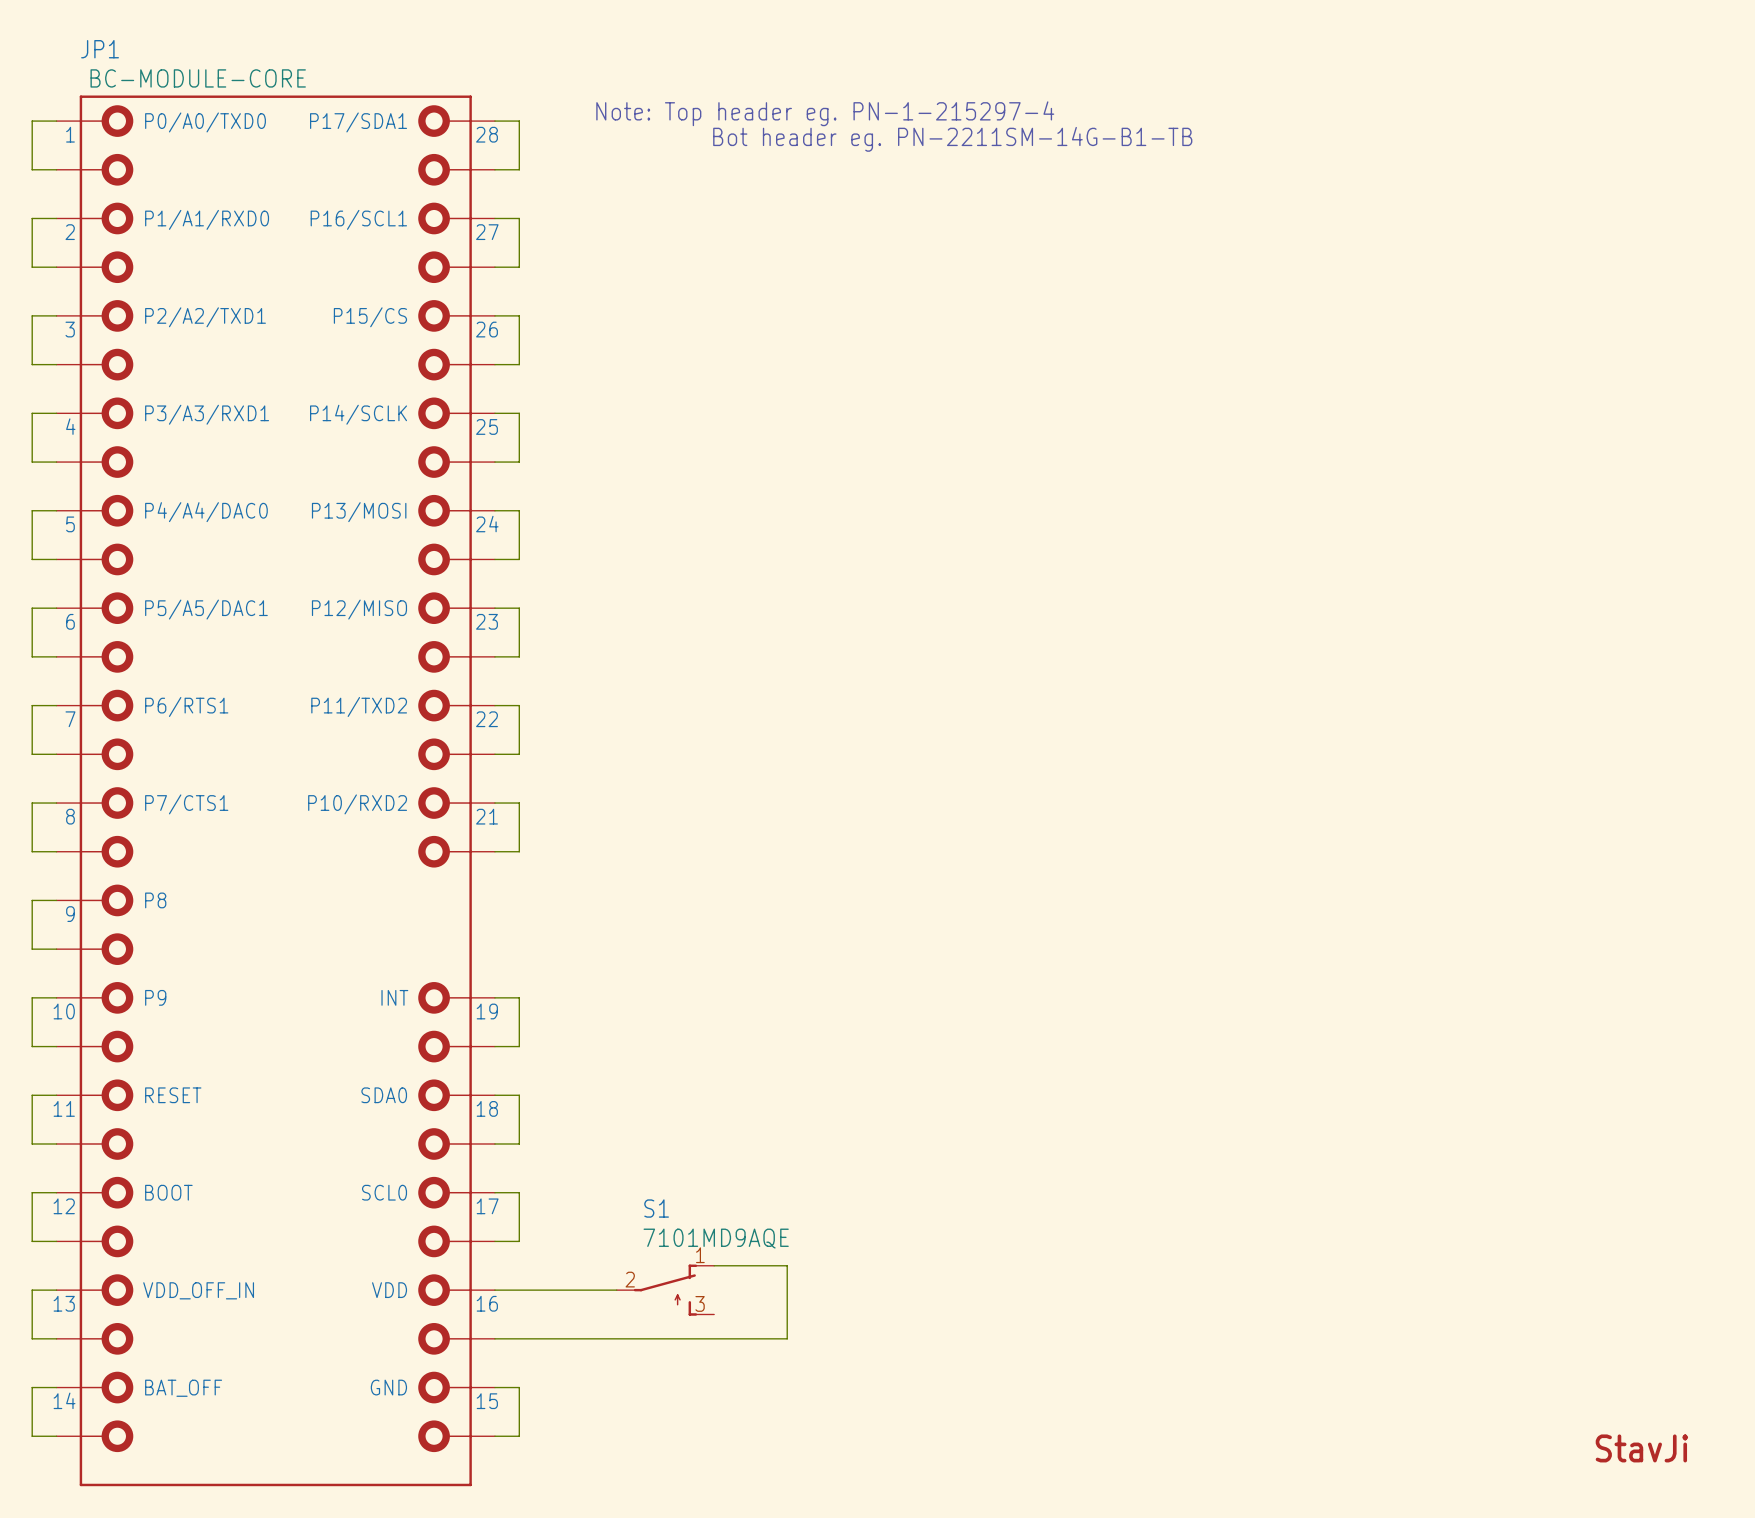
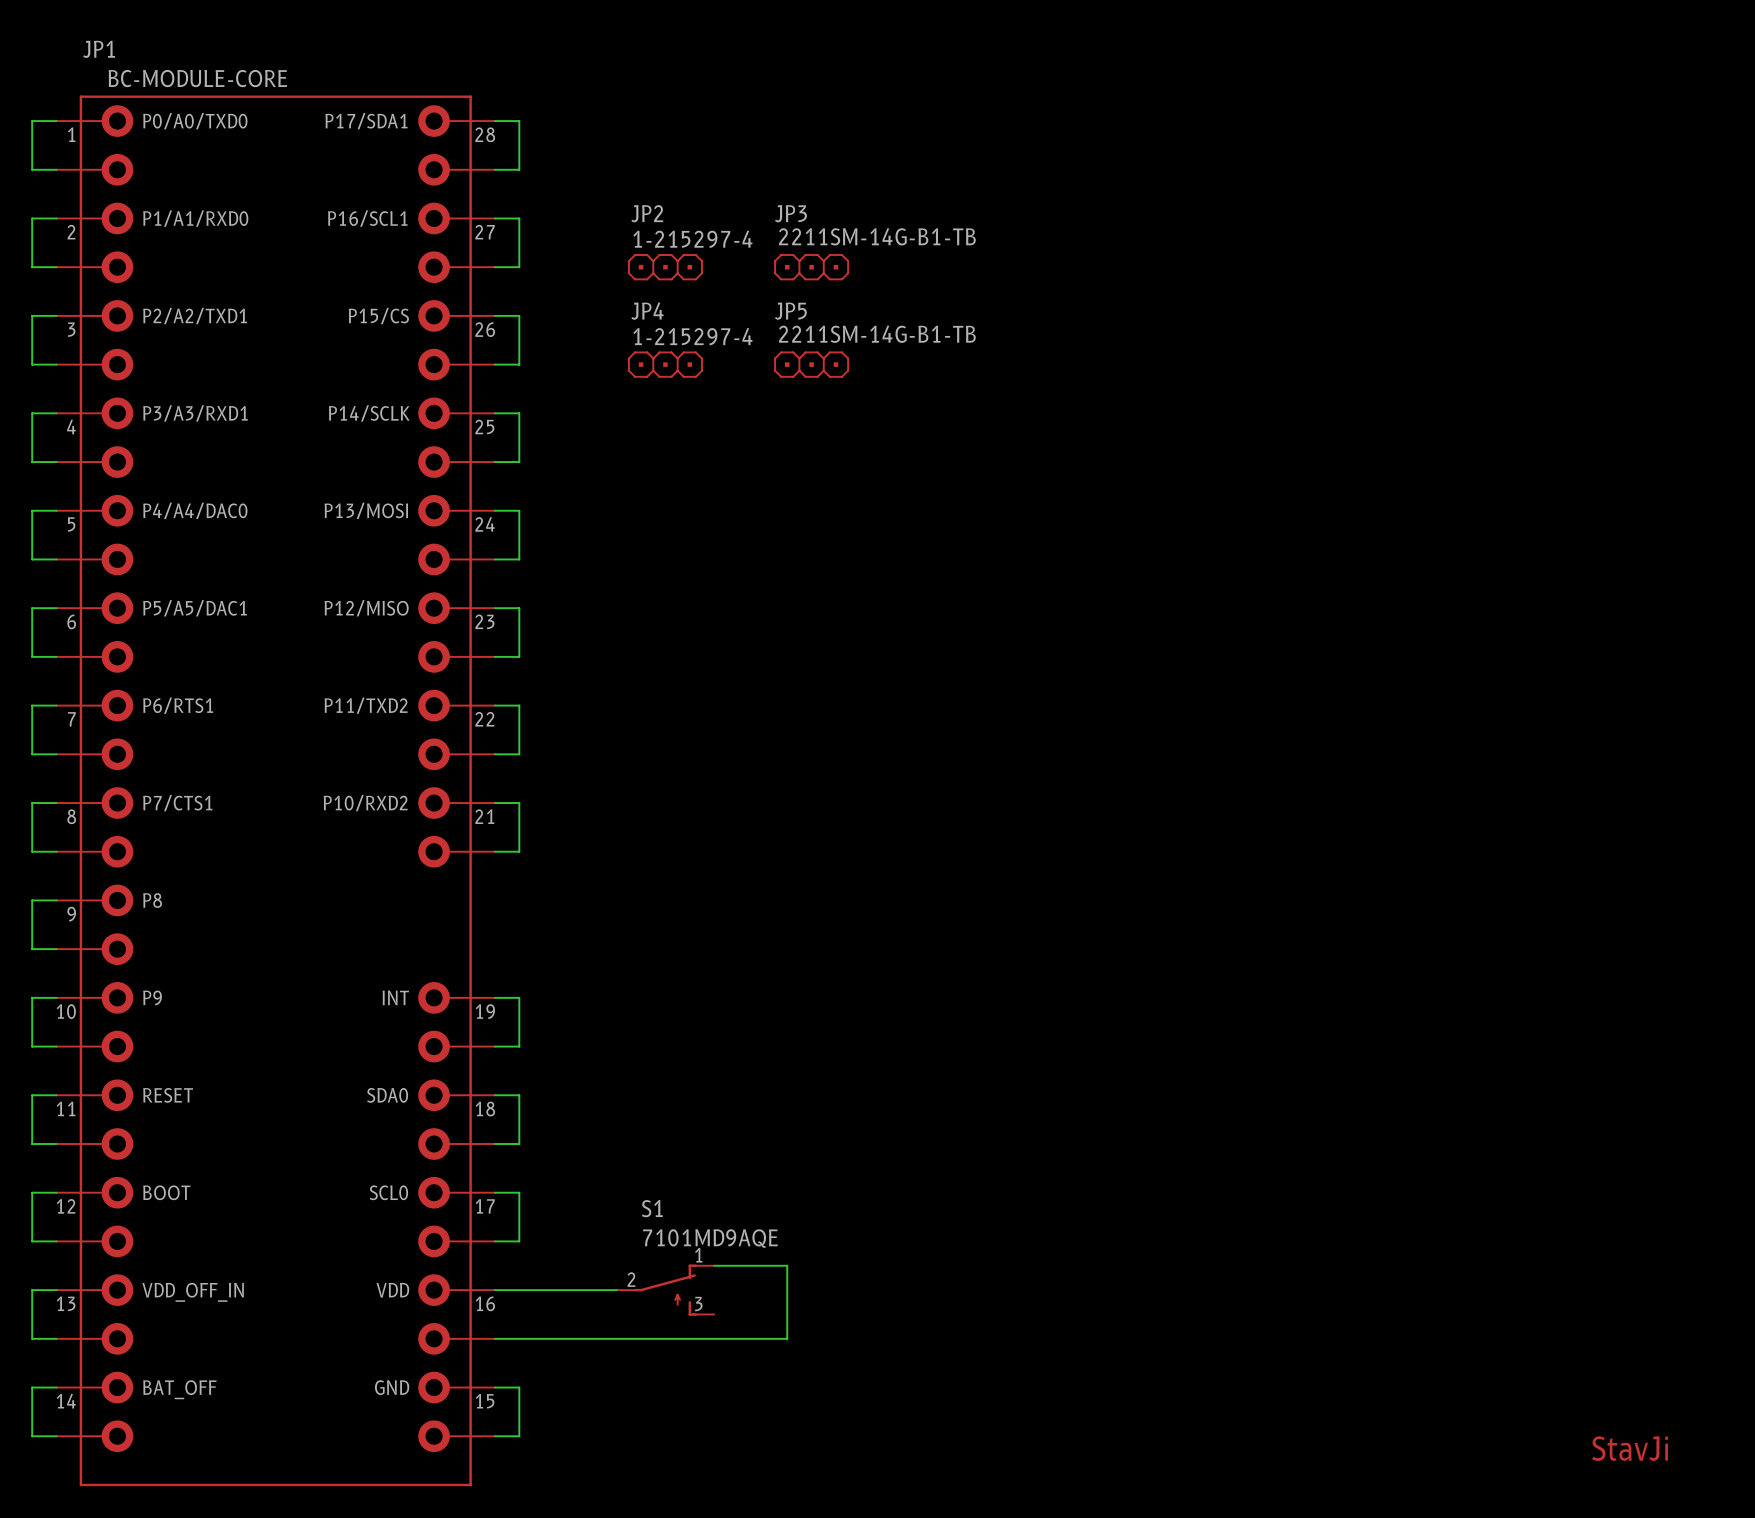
text: Note: Top header eg. PN-1-215297-4 (825, 113) -> none
text: Bot header eg. PN-2211SM-14G-B1-TB (952, 139) -> none
JP2: none -> 1-215297-4 (665, 267)
JP3: none -> 2211SM-14G-B1-TB (811, 267)
JP4: none -> 1-215297-4 (665, 364)
JP5: none -> 2211SM-14G-B1-TB (811, 364)

